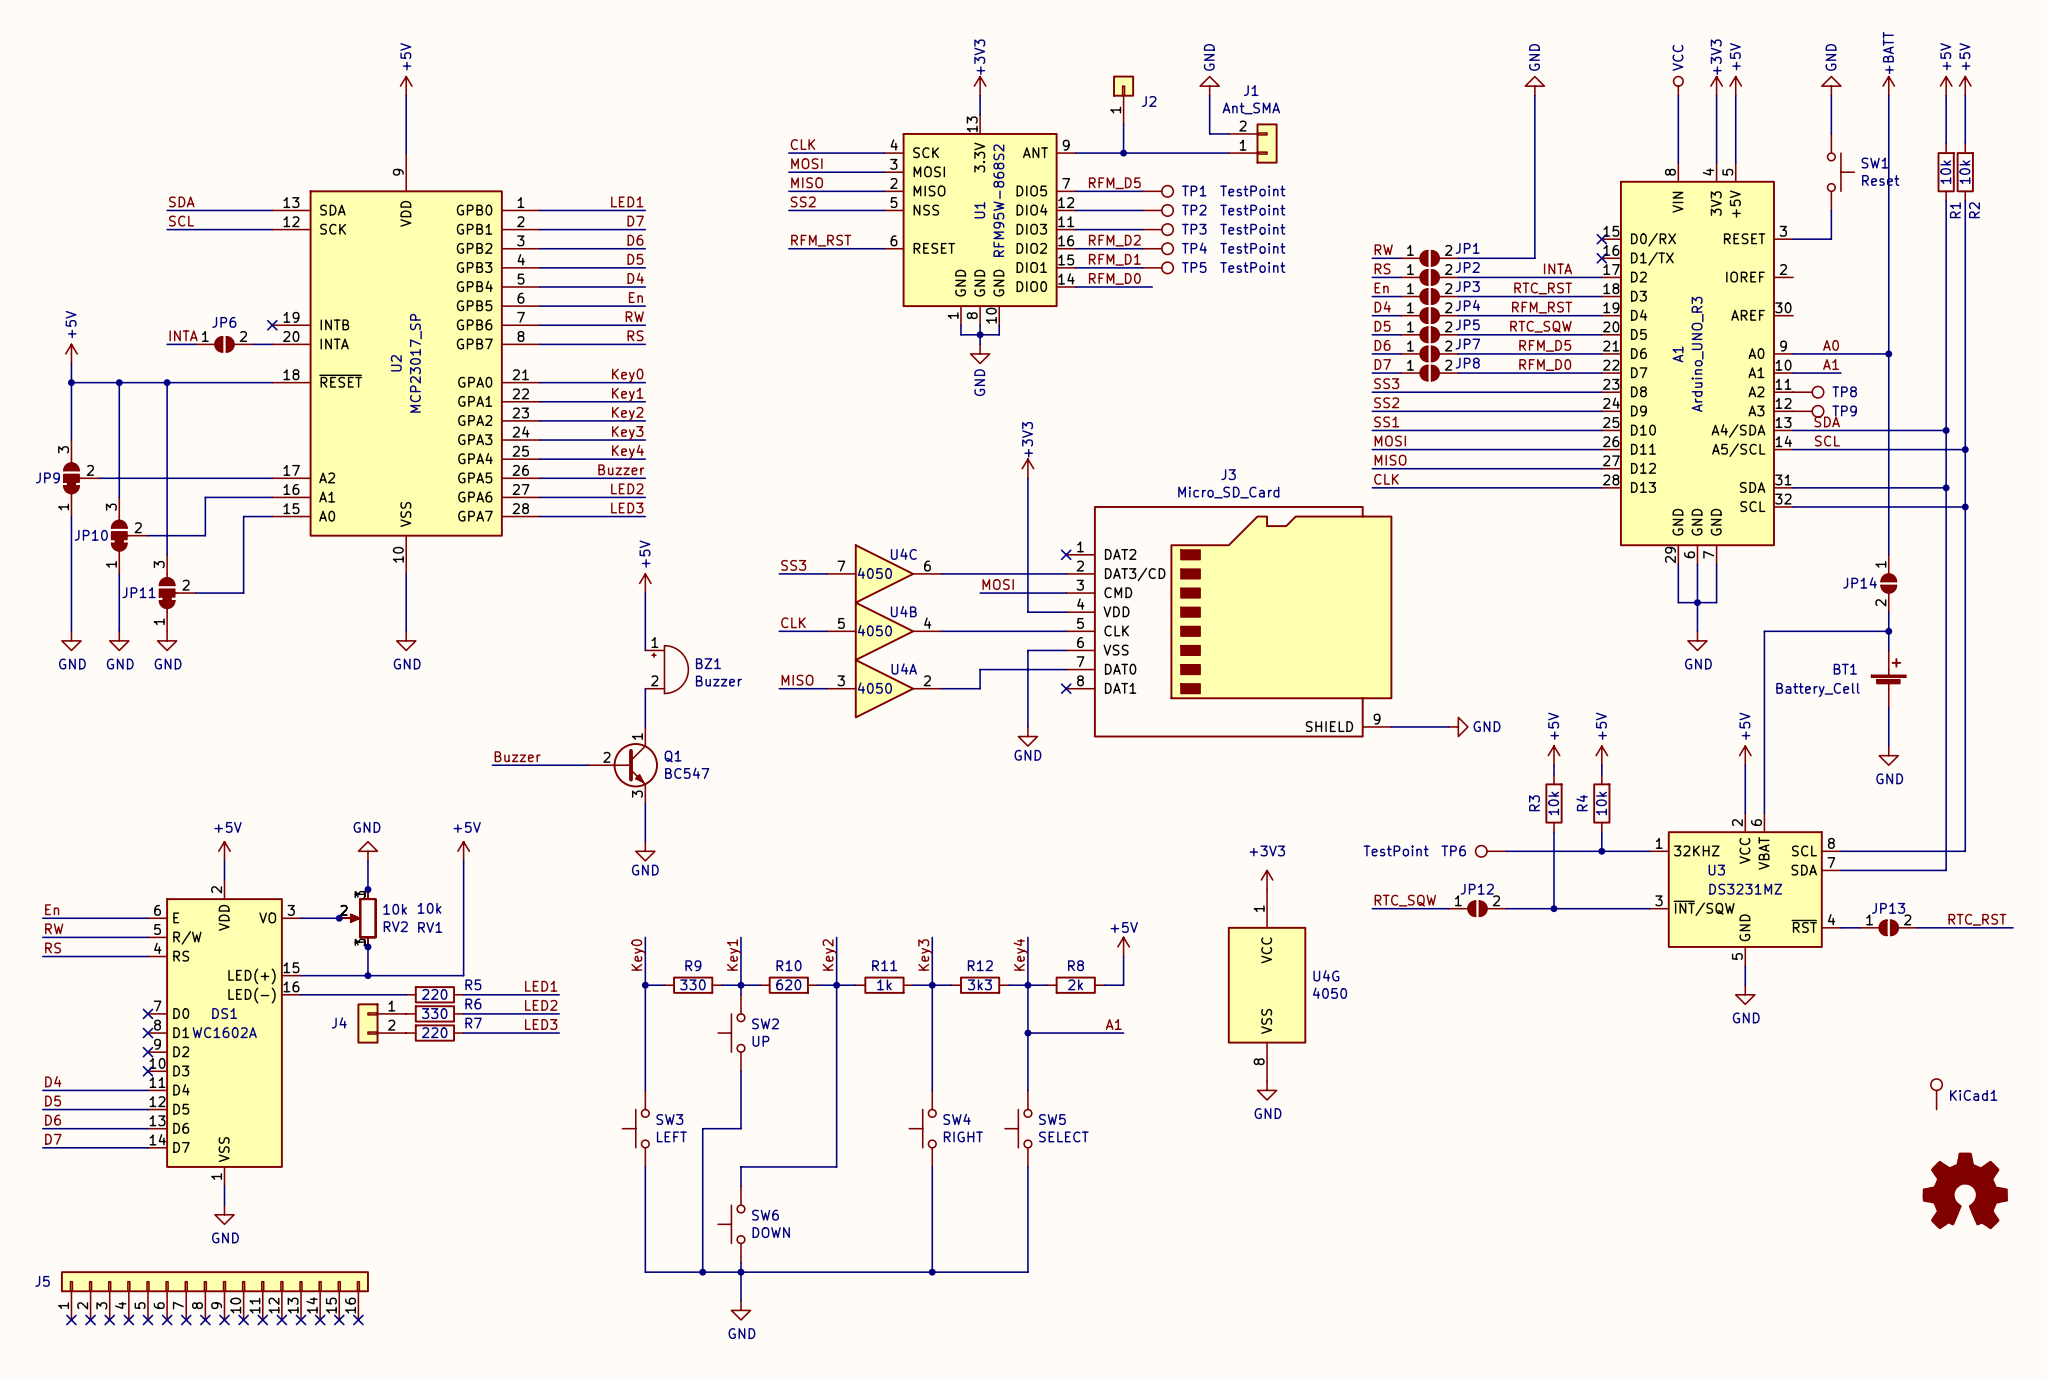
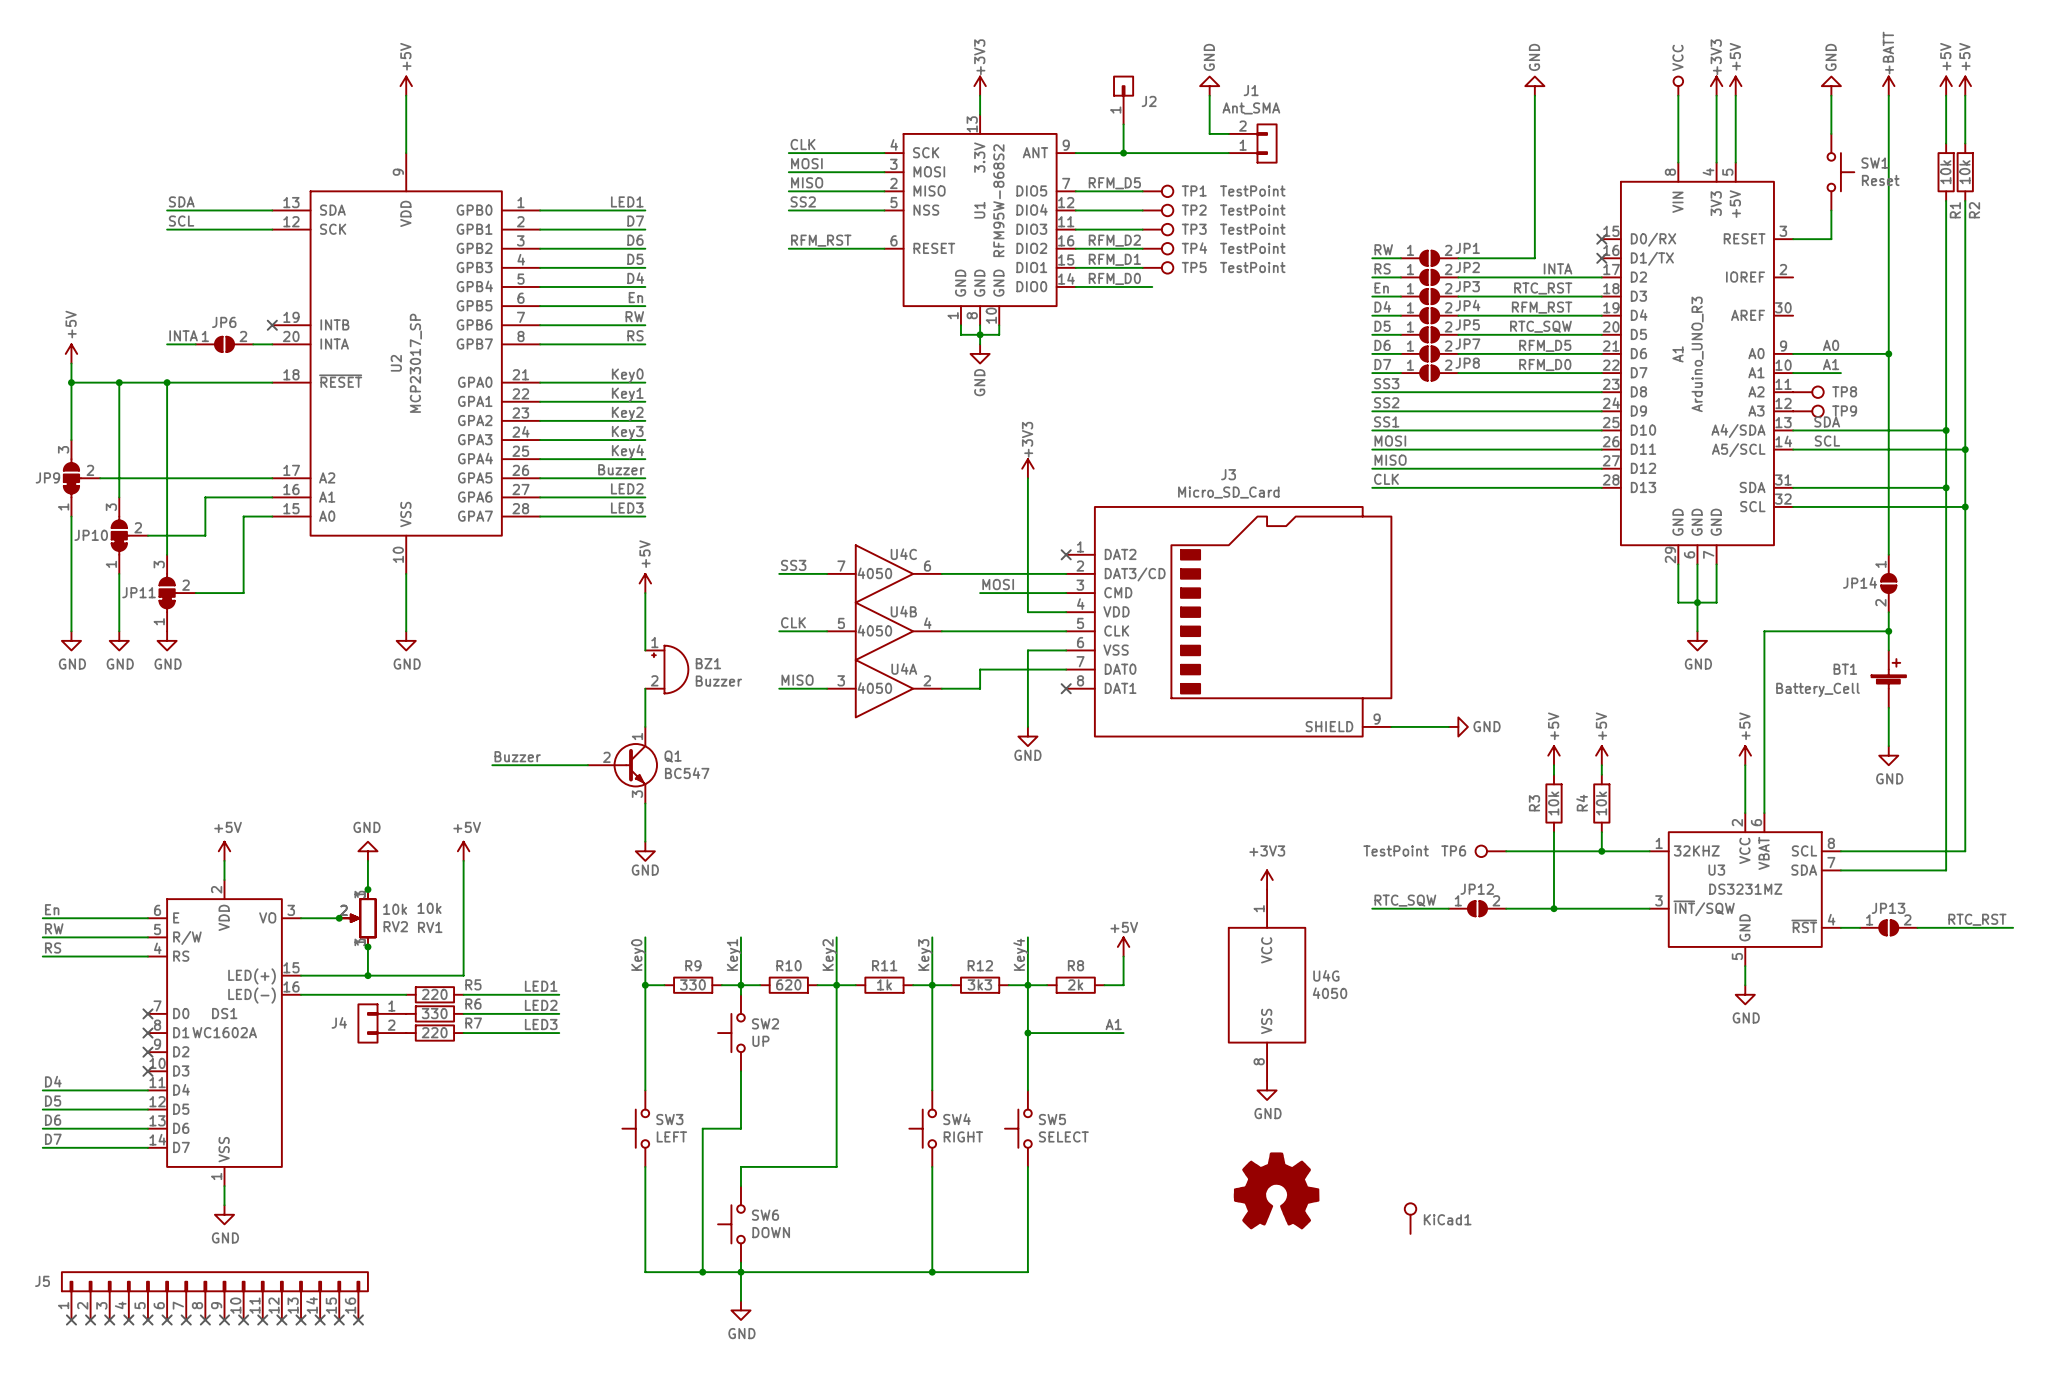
KiCad1 position: (1936, 1094) -> (1410, 1218)
part: none -> (1276, 1190)
part: (1965, 1190) -> none

